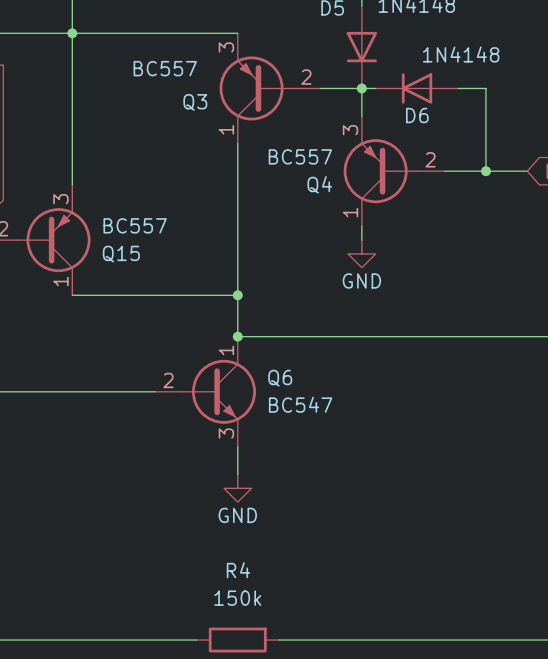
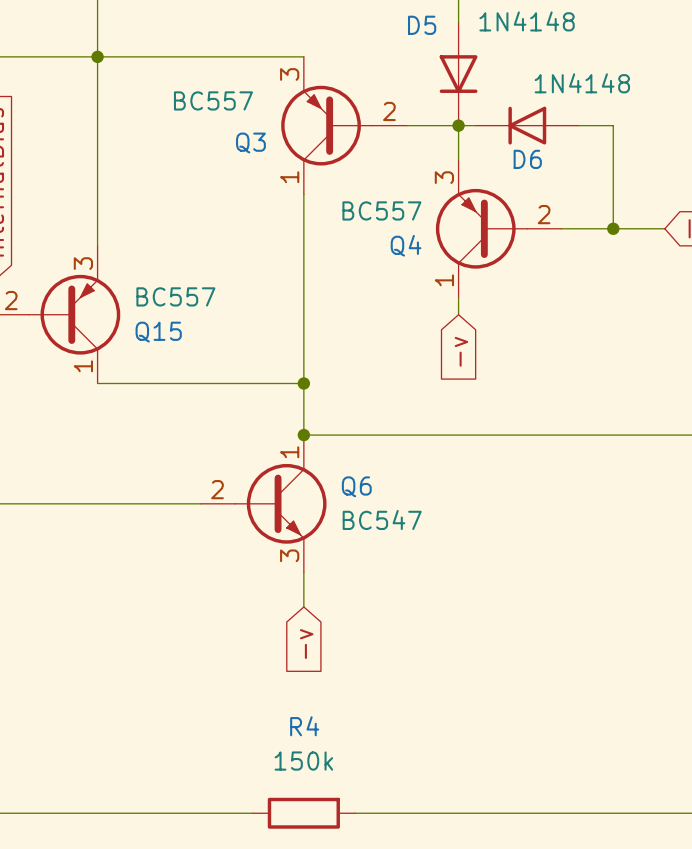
power symbol: GND (361, 253) -> none
global label: none -> -v (461, 351)
power symbol: GND (237, 488) -> none
global label: none -> -v (306, 644)

